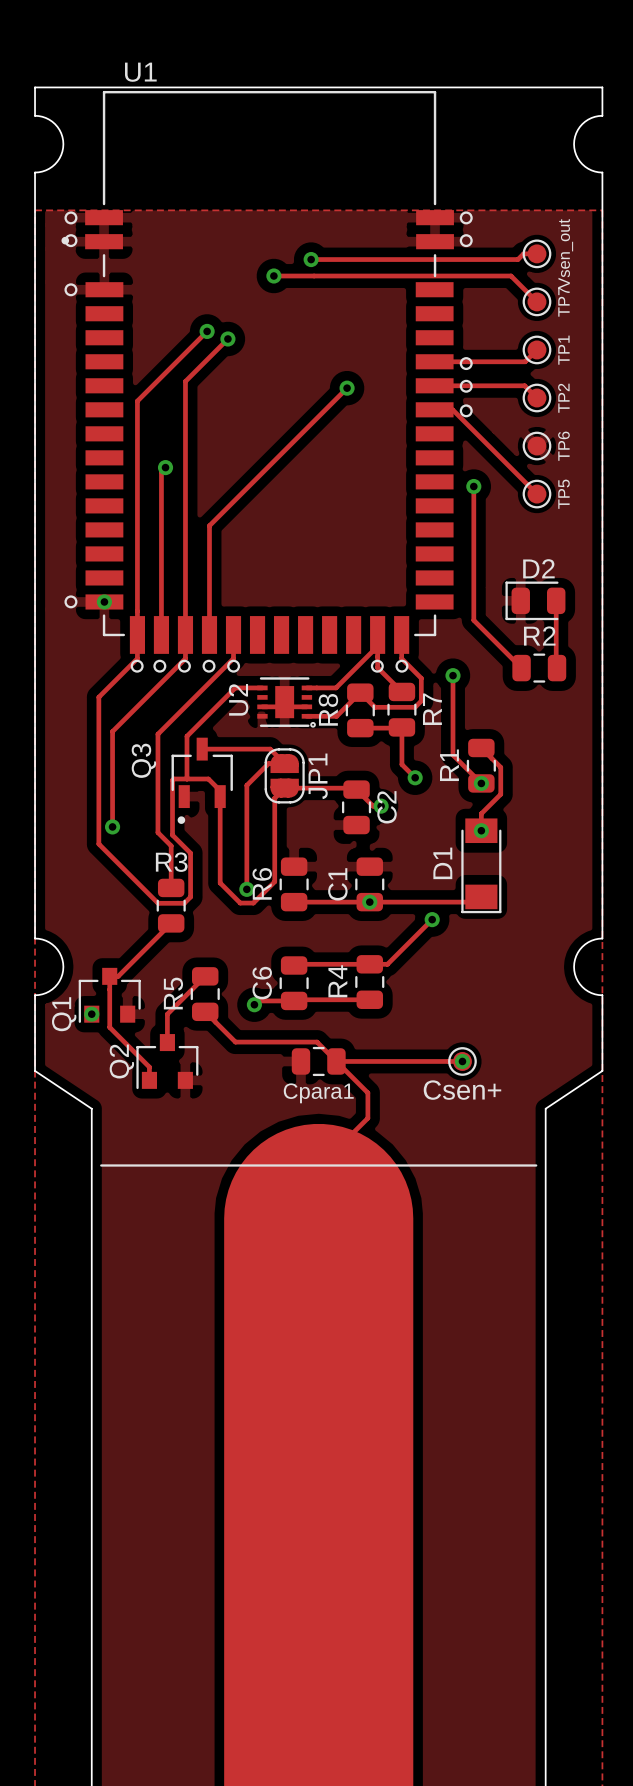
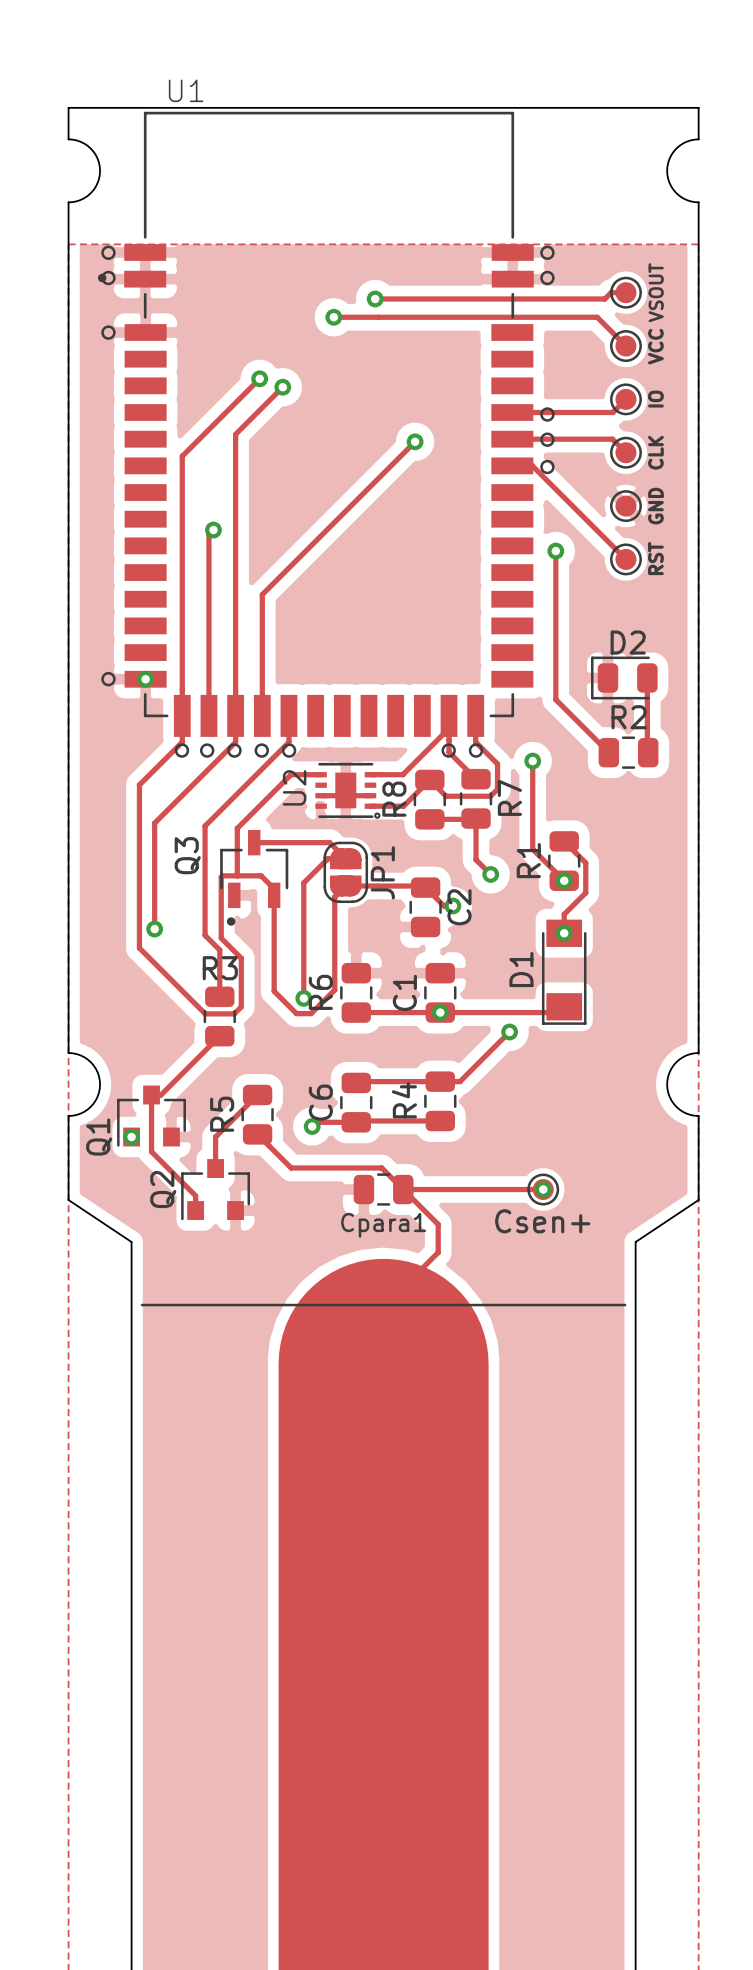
part value: Vsen_out (565, 253) -> VSOUT (656, 292)
TP7 name: TP7 (563, 302) -> VCC (655, 346)
TP1 name: TP1 (563, 350) -> IO (655, 399)
TP2 name: TP2 (563, 398) -> CLK (655, 452)
TP6 name: TP6 (563, 446) -> GND (655, 506)
TP5 name: TP5 (564, 494) -> RST (655, 558)

